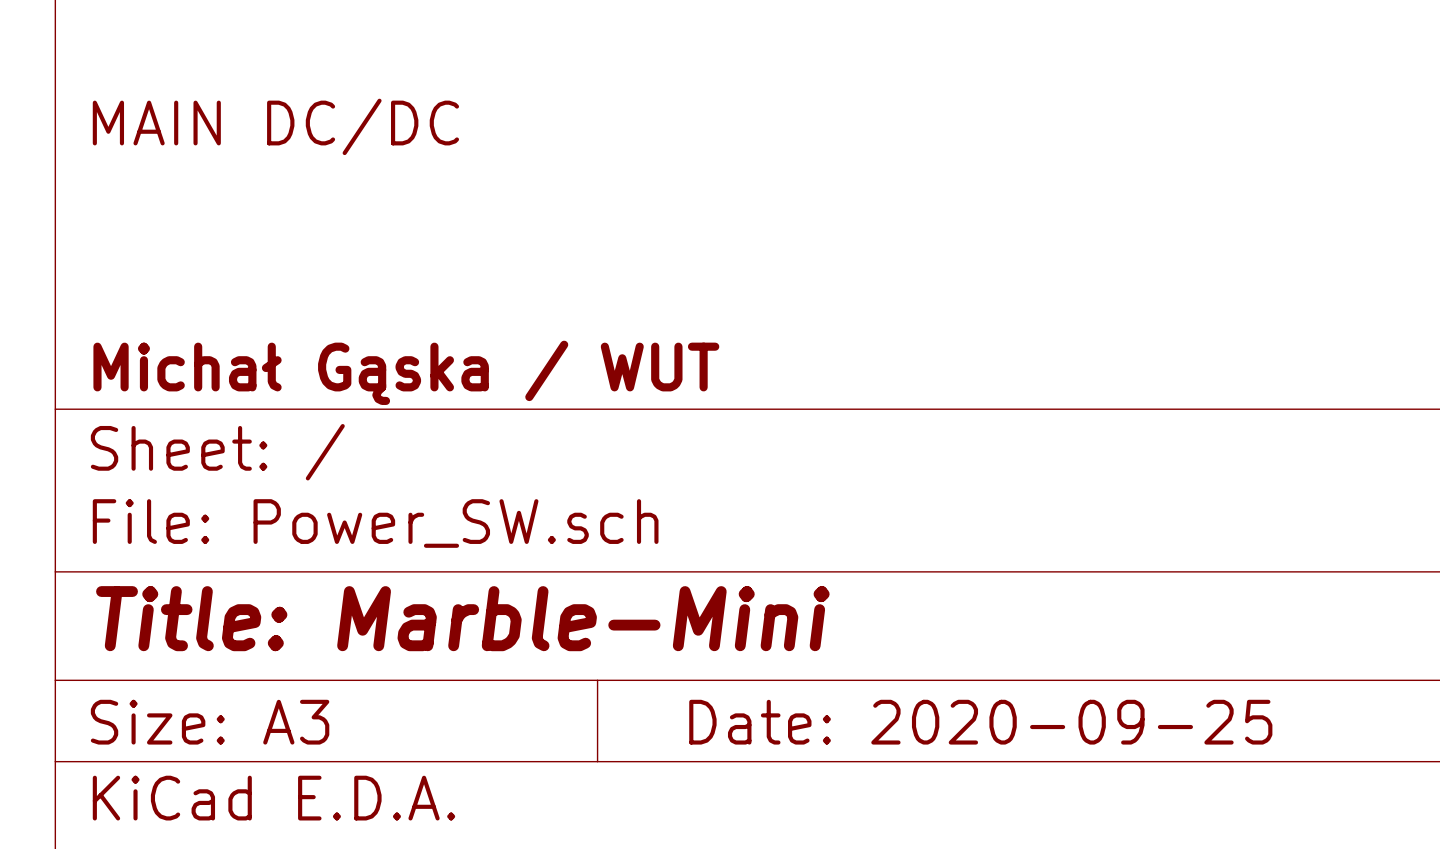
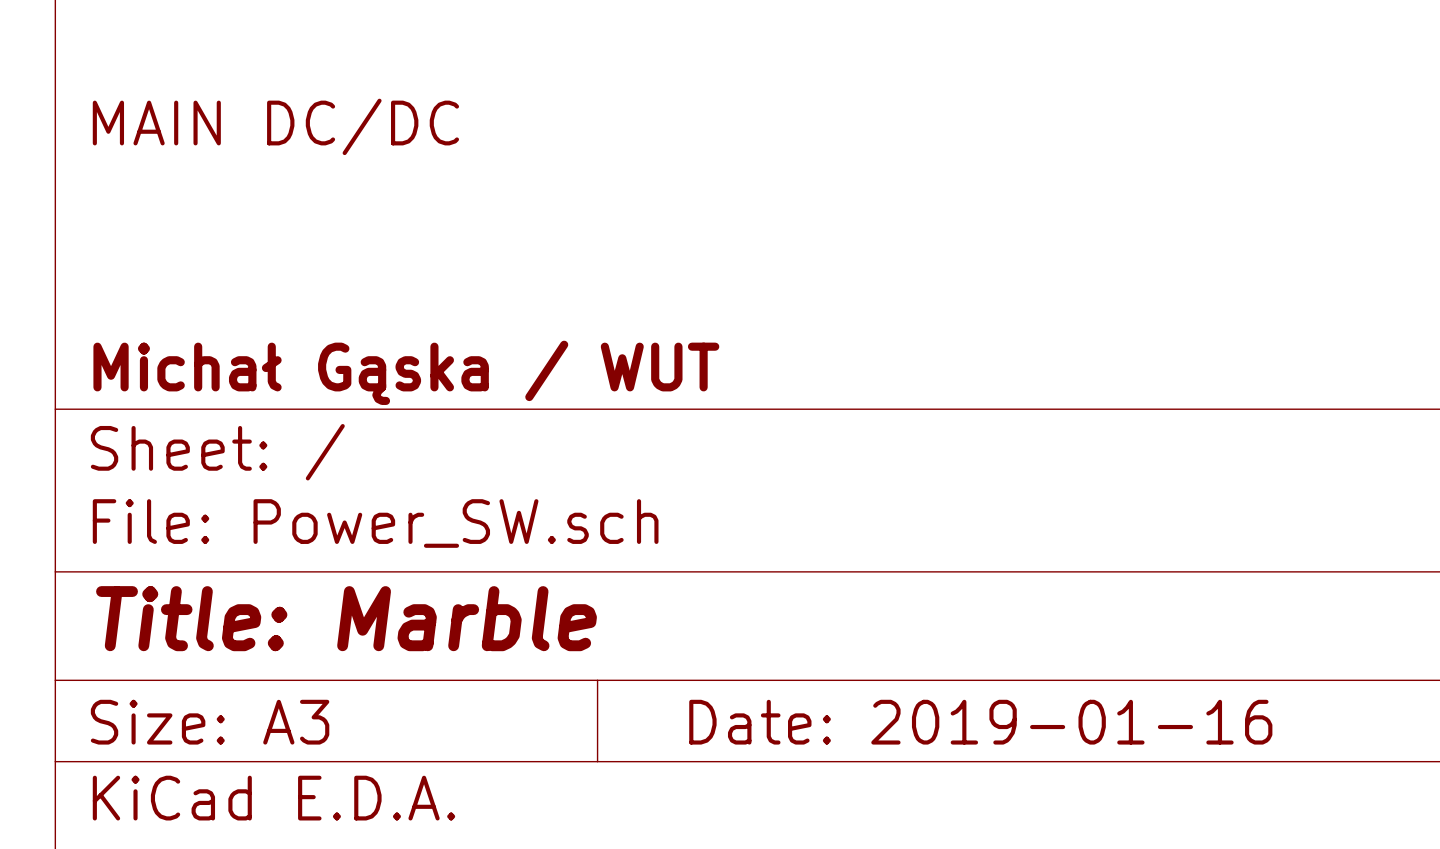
title block: Title: Marble-Mini (462, 618) -> Title: Marble (346, 618)
title block: Date: 2020-09-25 (980, 722) -> Date: 2019-01-16 (980, 722)

